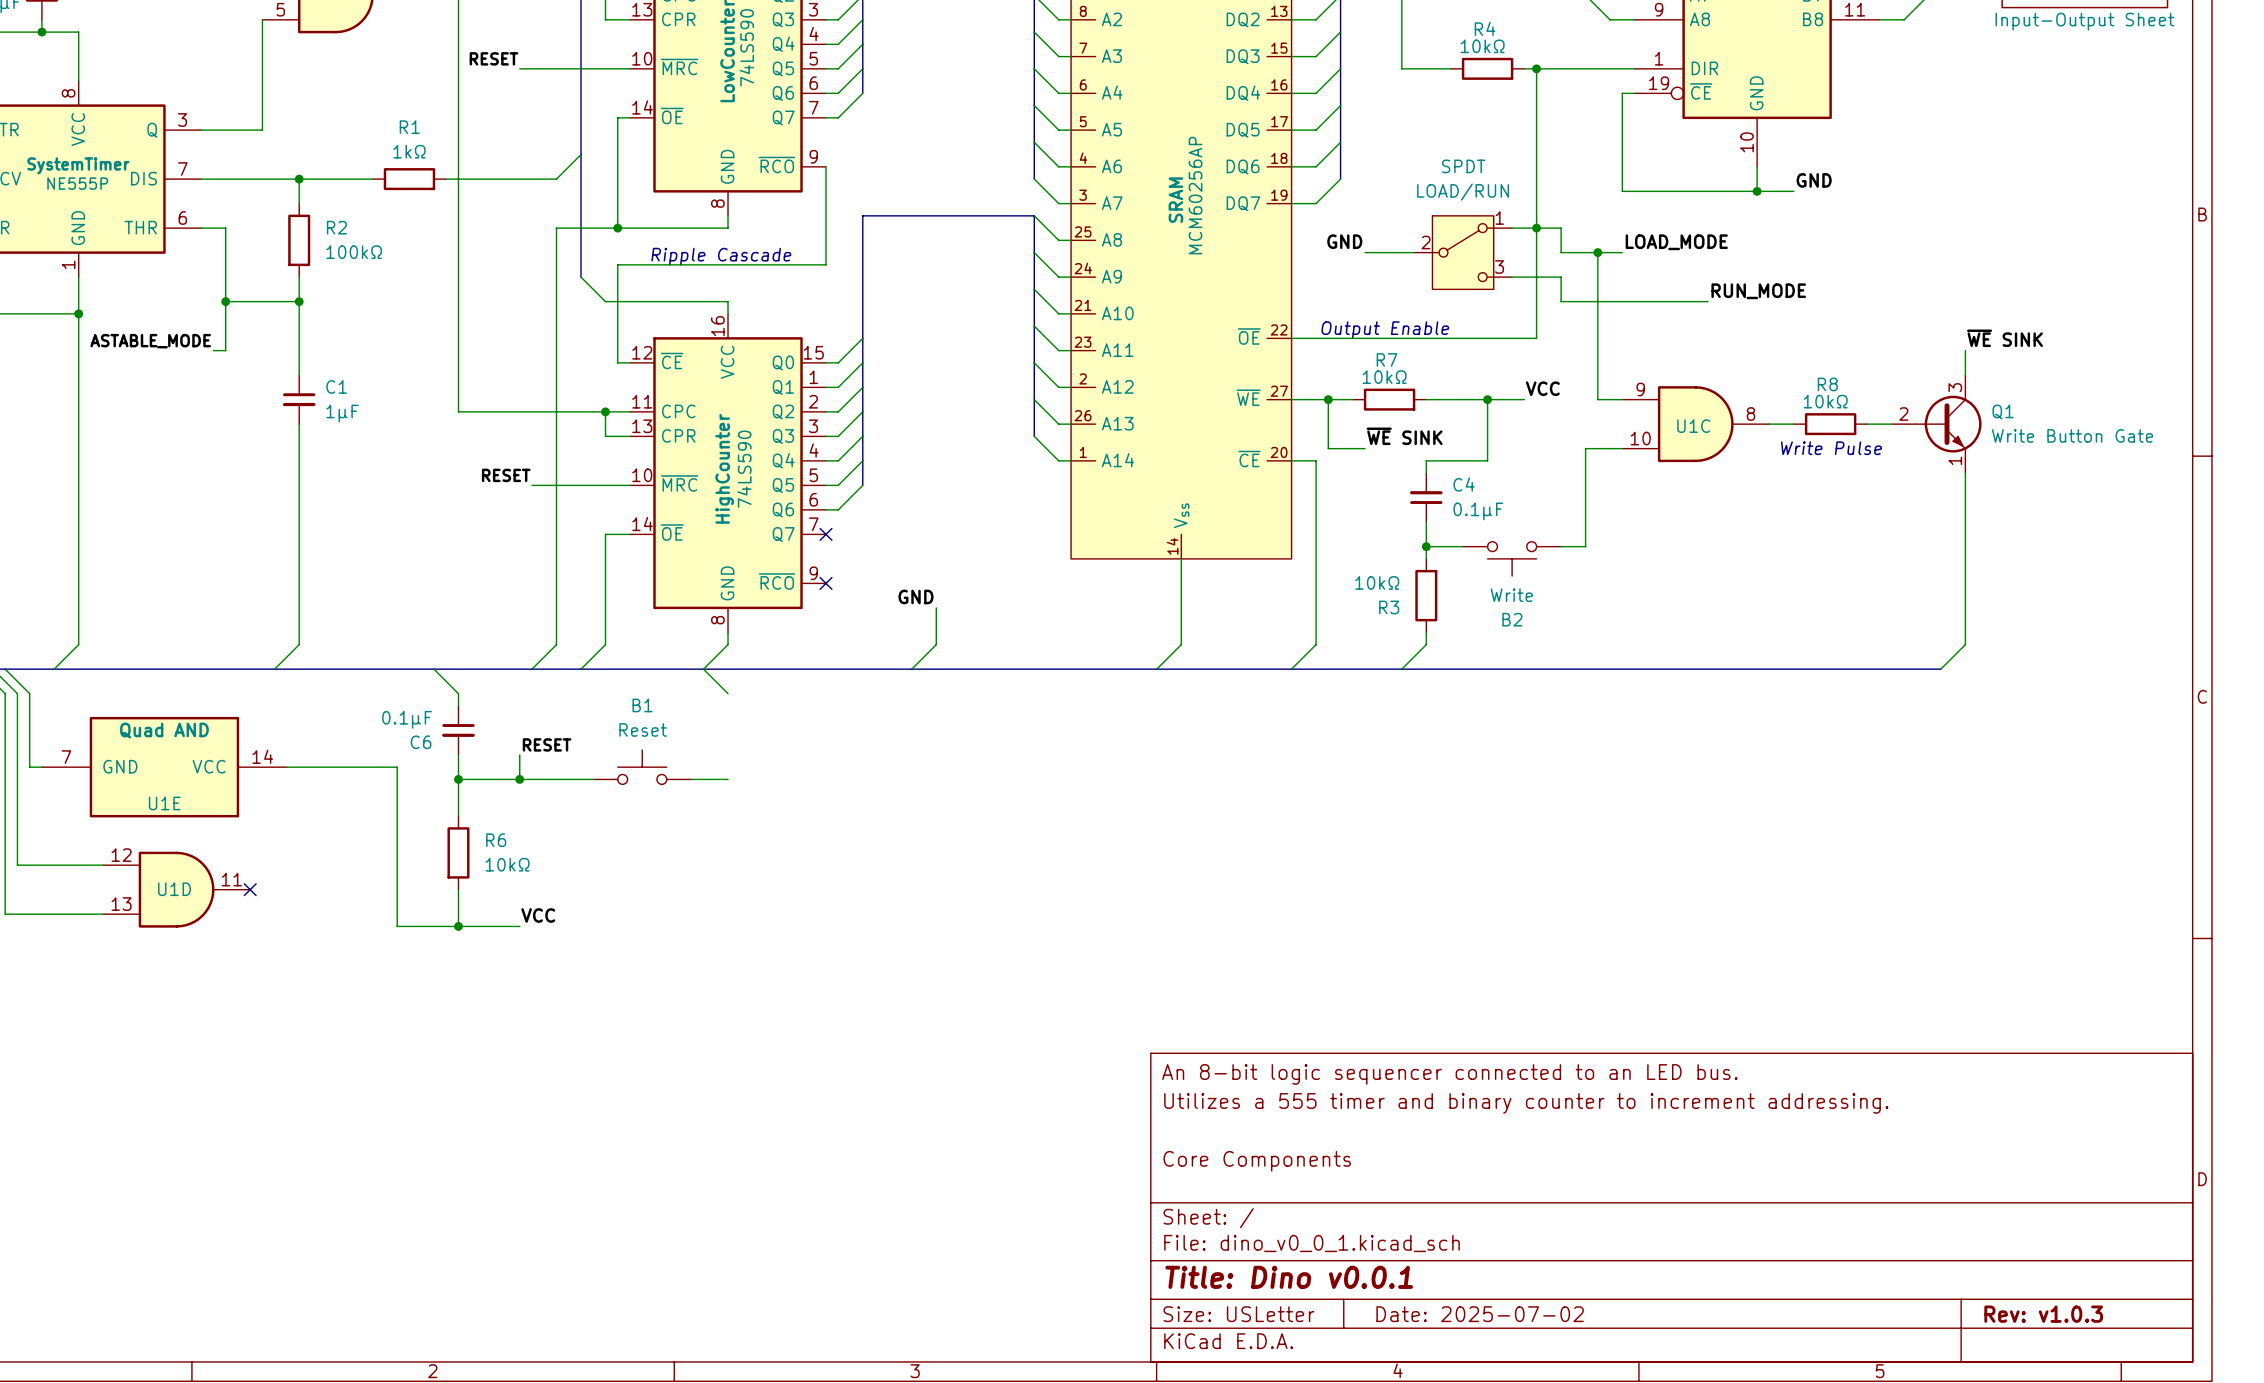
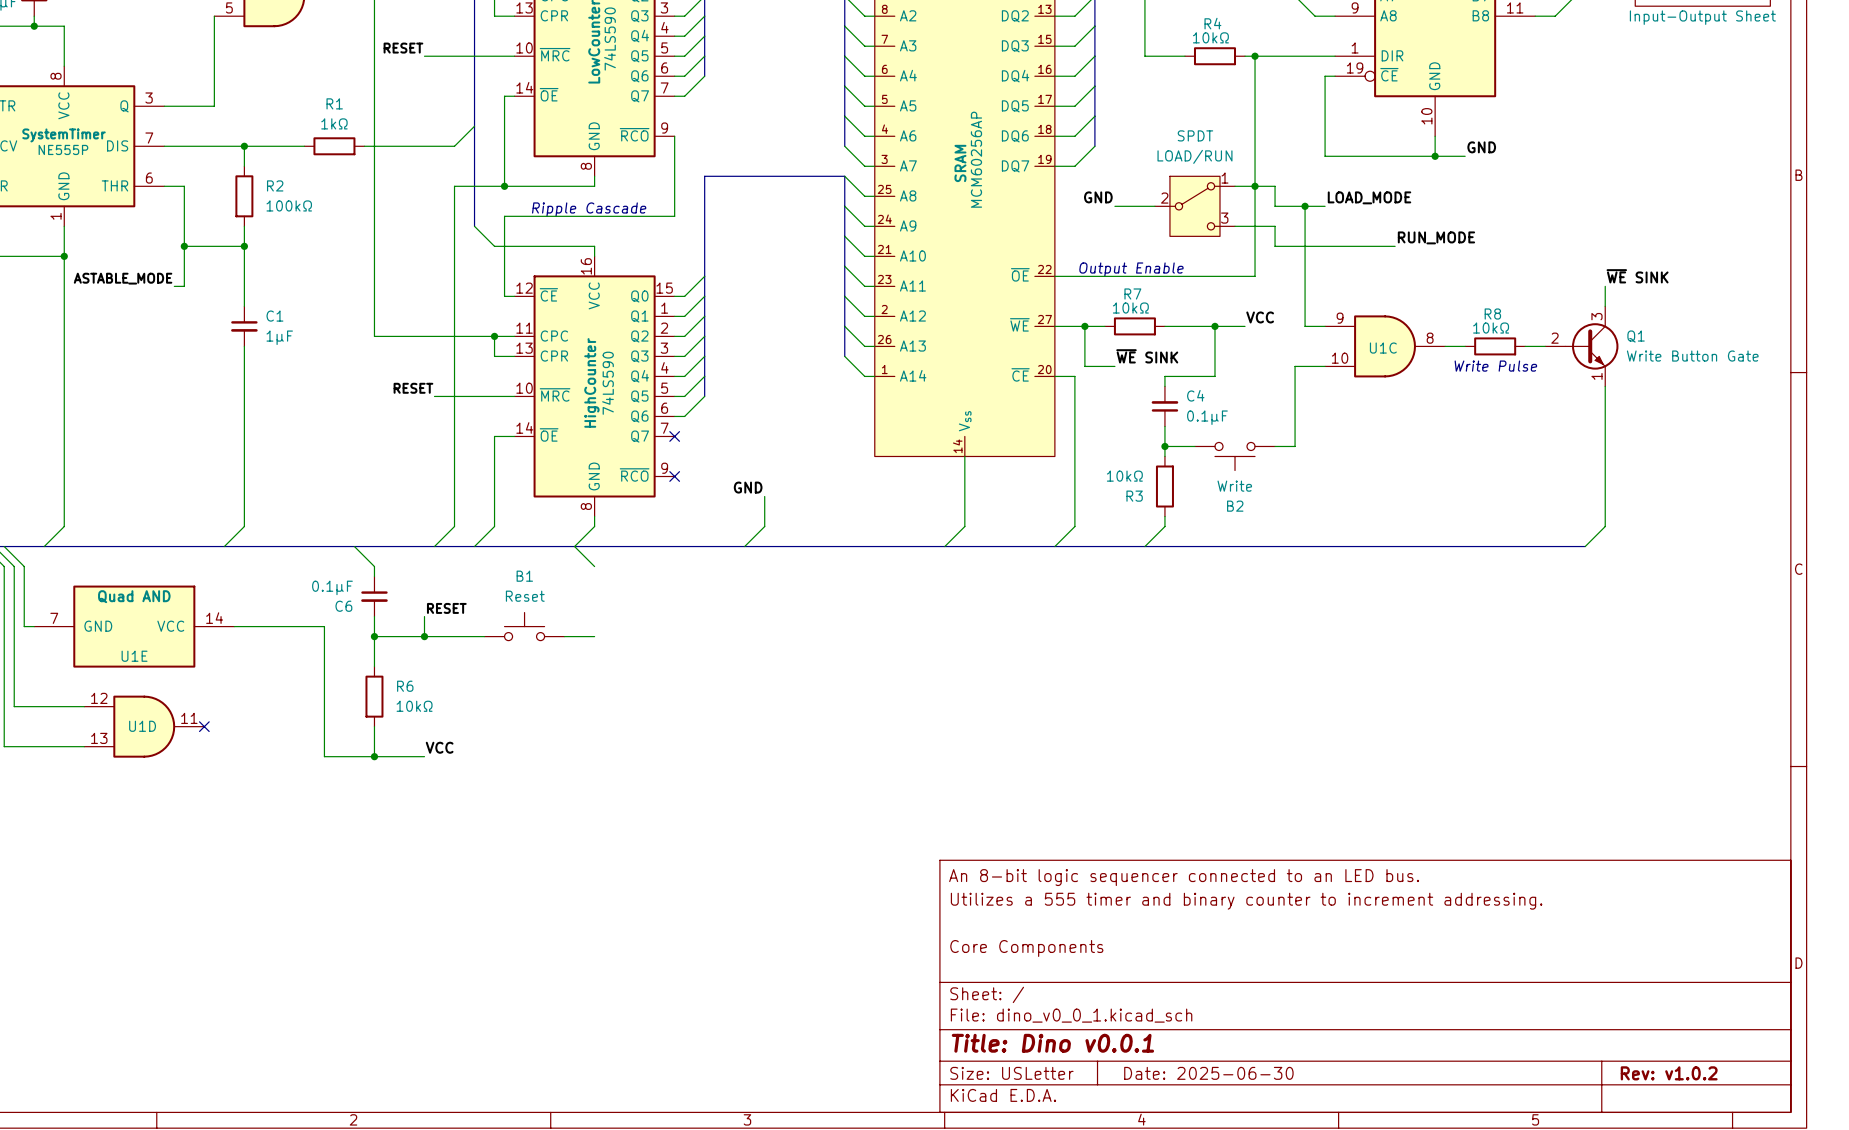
title block: Date: 2025-07-02 (1480, 1314) -> Date: 2025-06-30 (1208, 1073)
title block: Rev: v1.0.3 (2043, 1314) -> Rev: v1.0.2 (1669, 1073)

